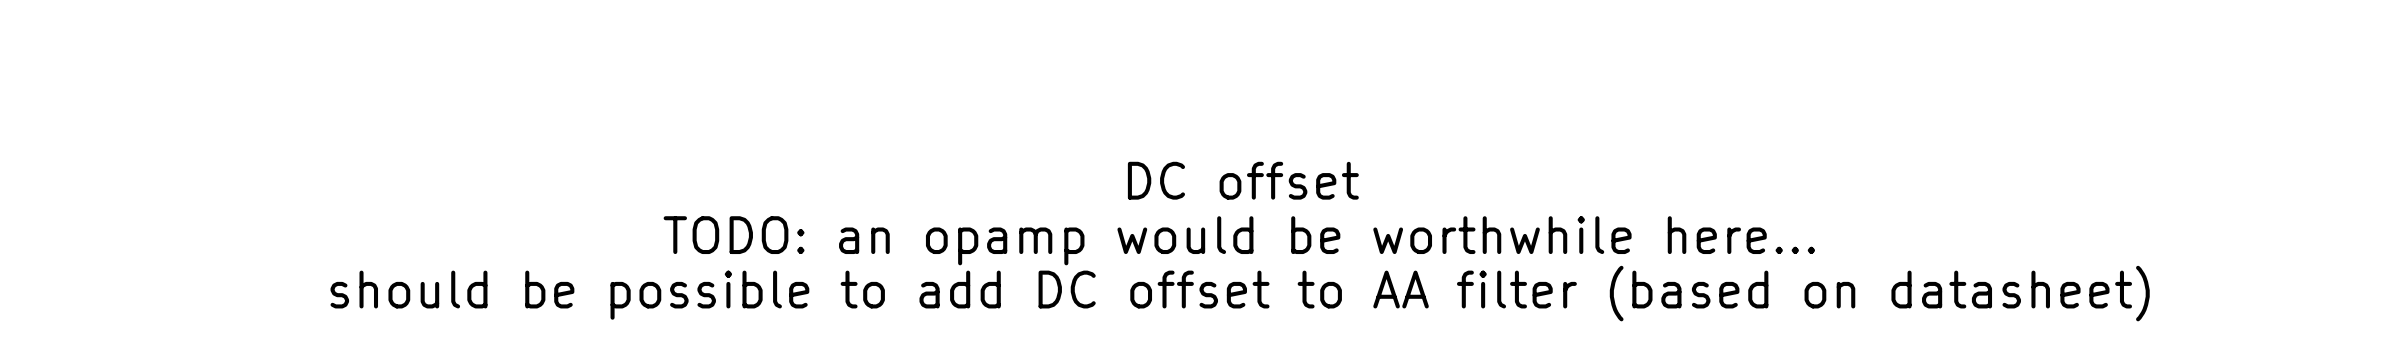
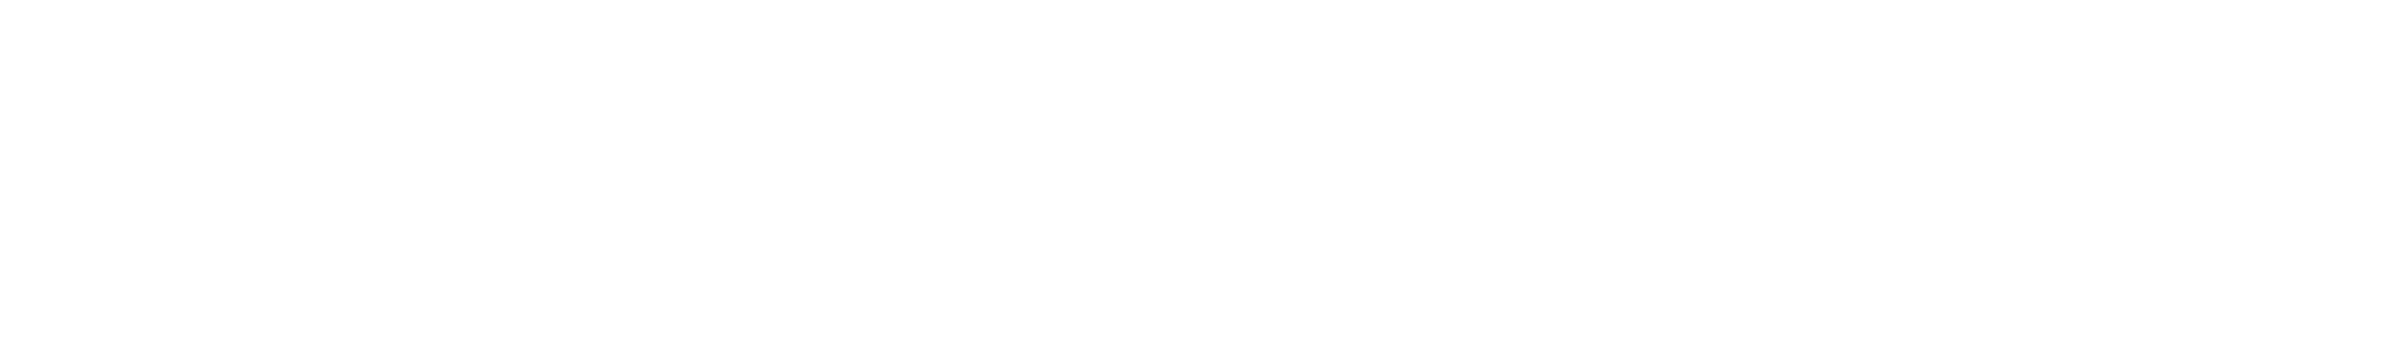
text: DC offset (1243, 180) -> none
text: TODO: an opamp would be worthwhile here... (1239, 240) -> none
text: should be possible to add DC offset to AA filter (based on datasheet) (1240, 293) -> none

